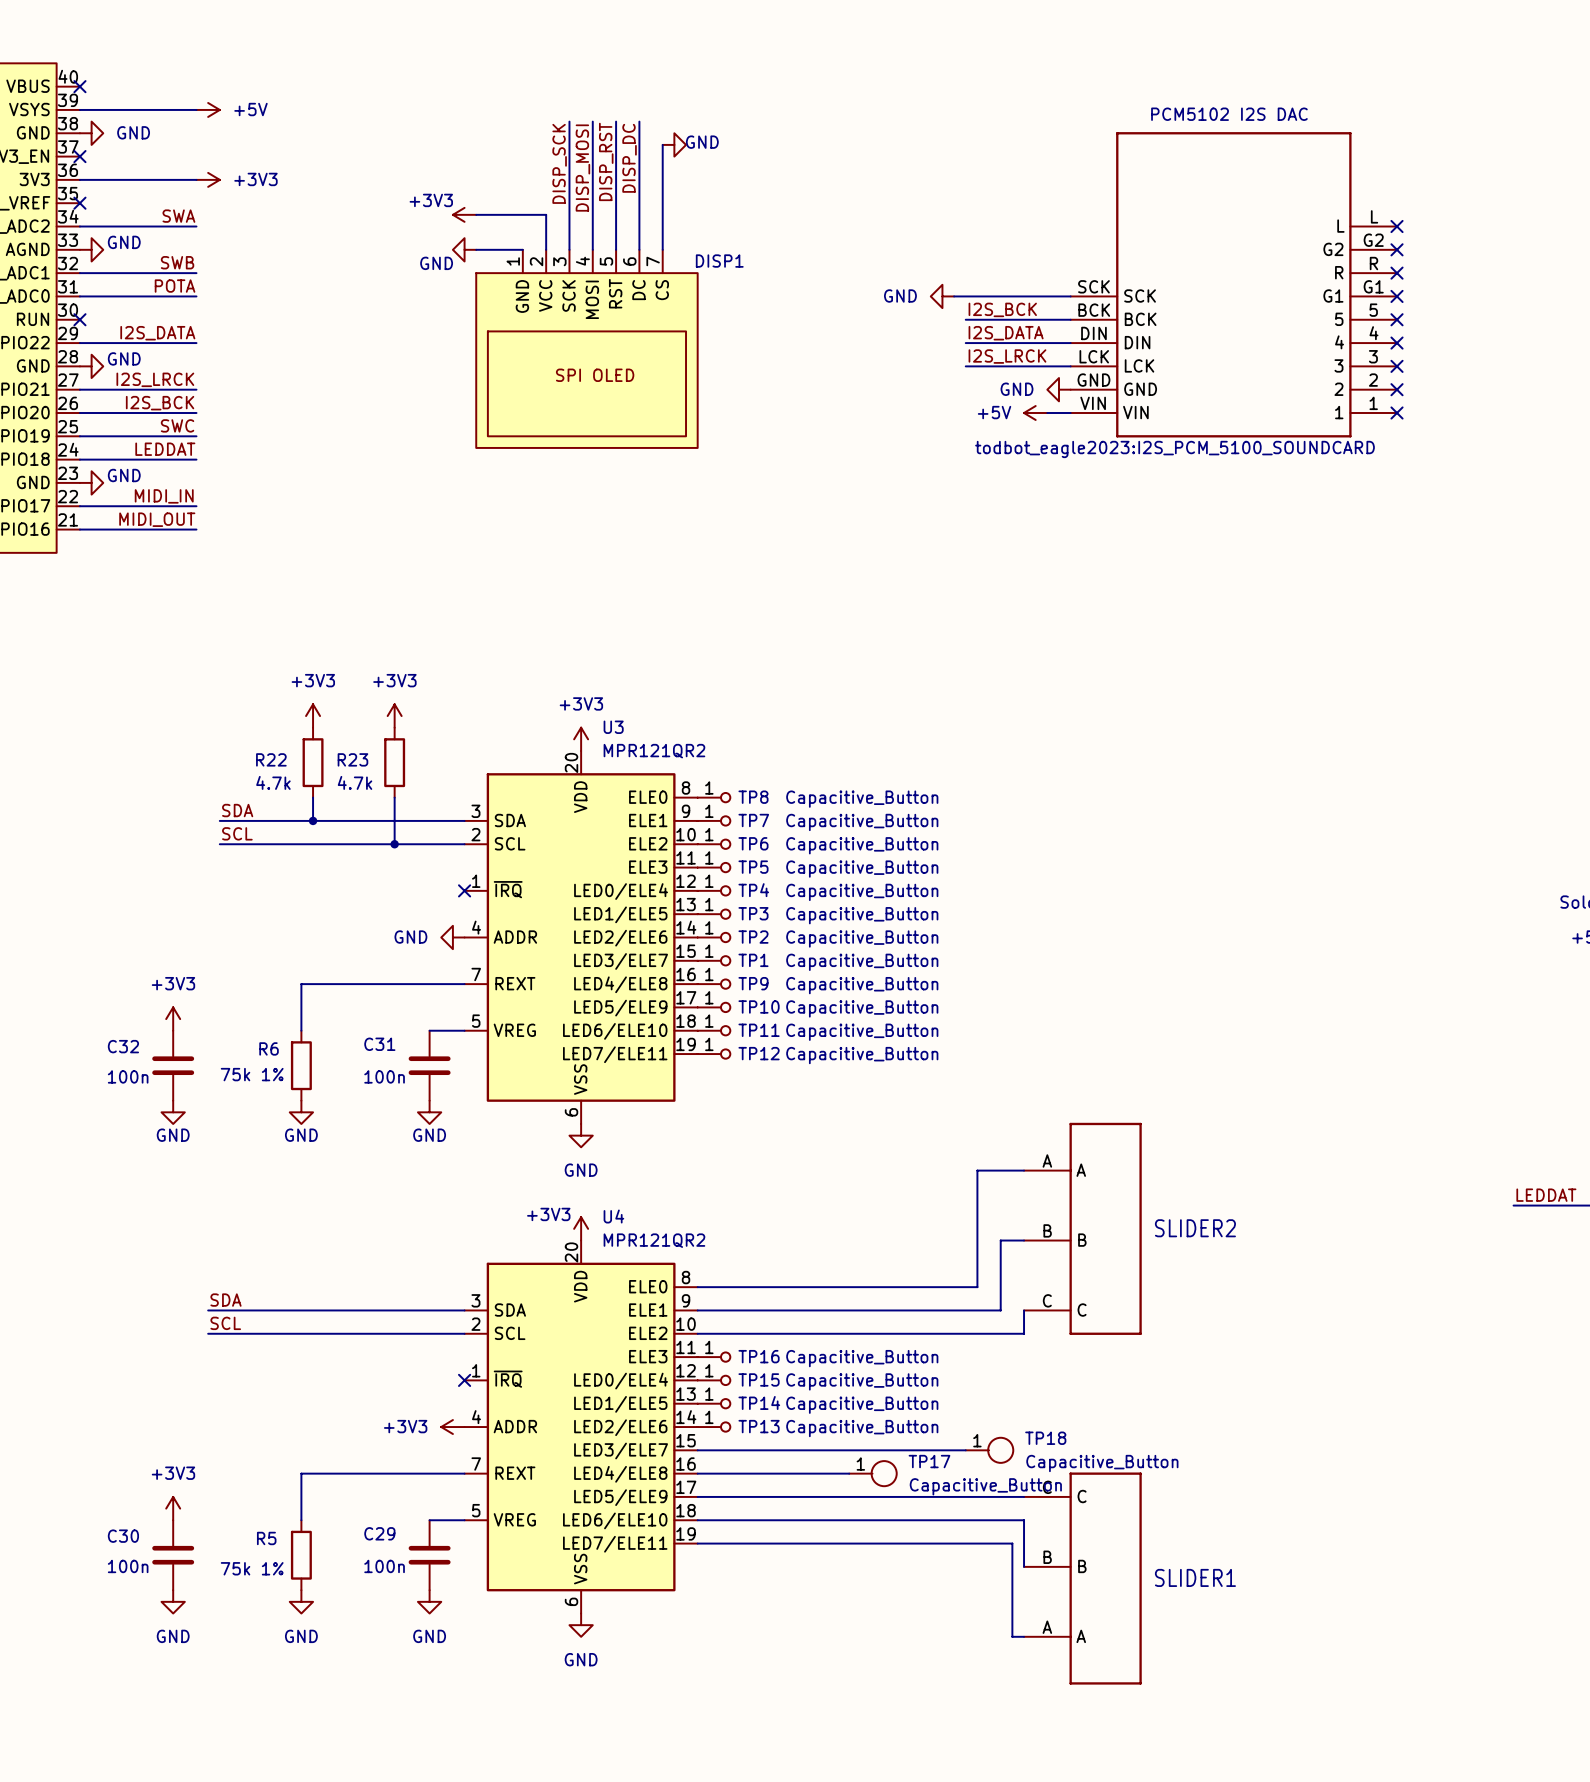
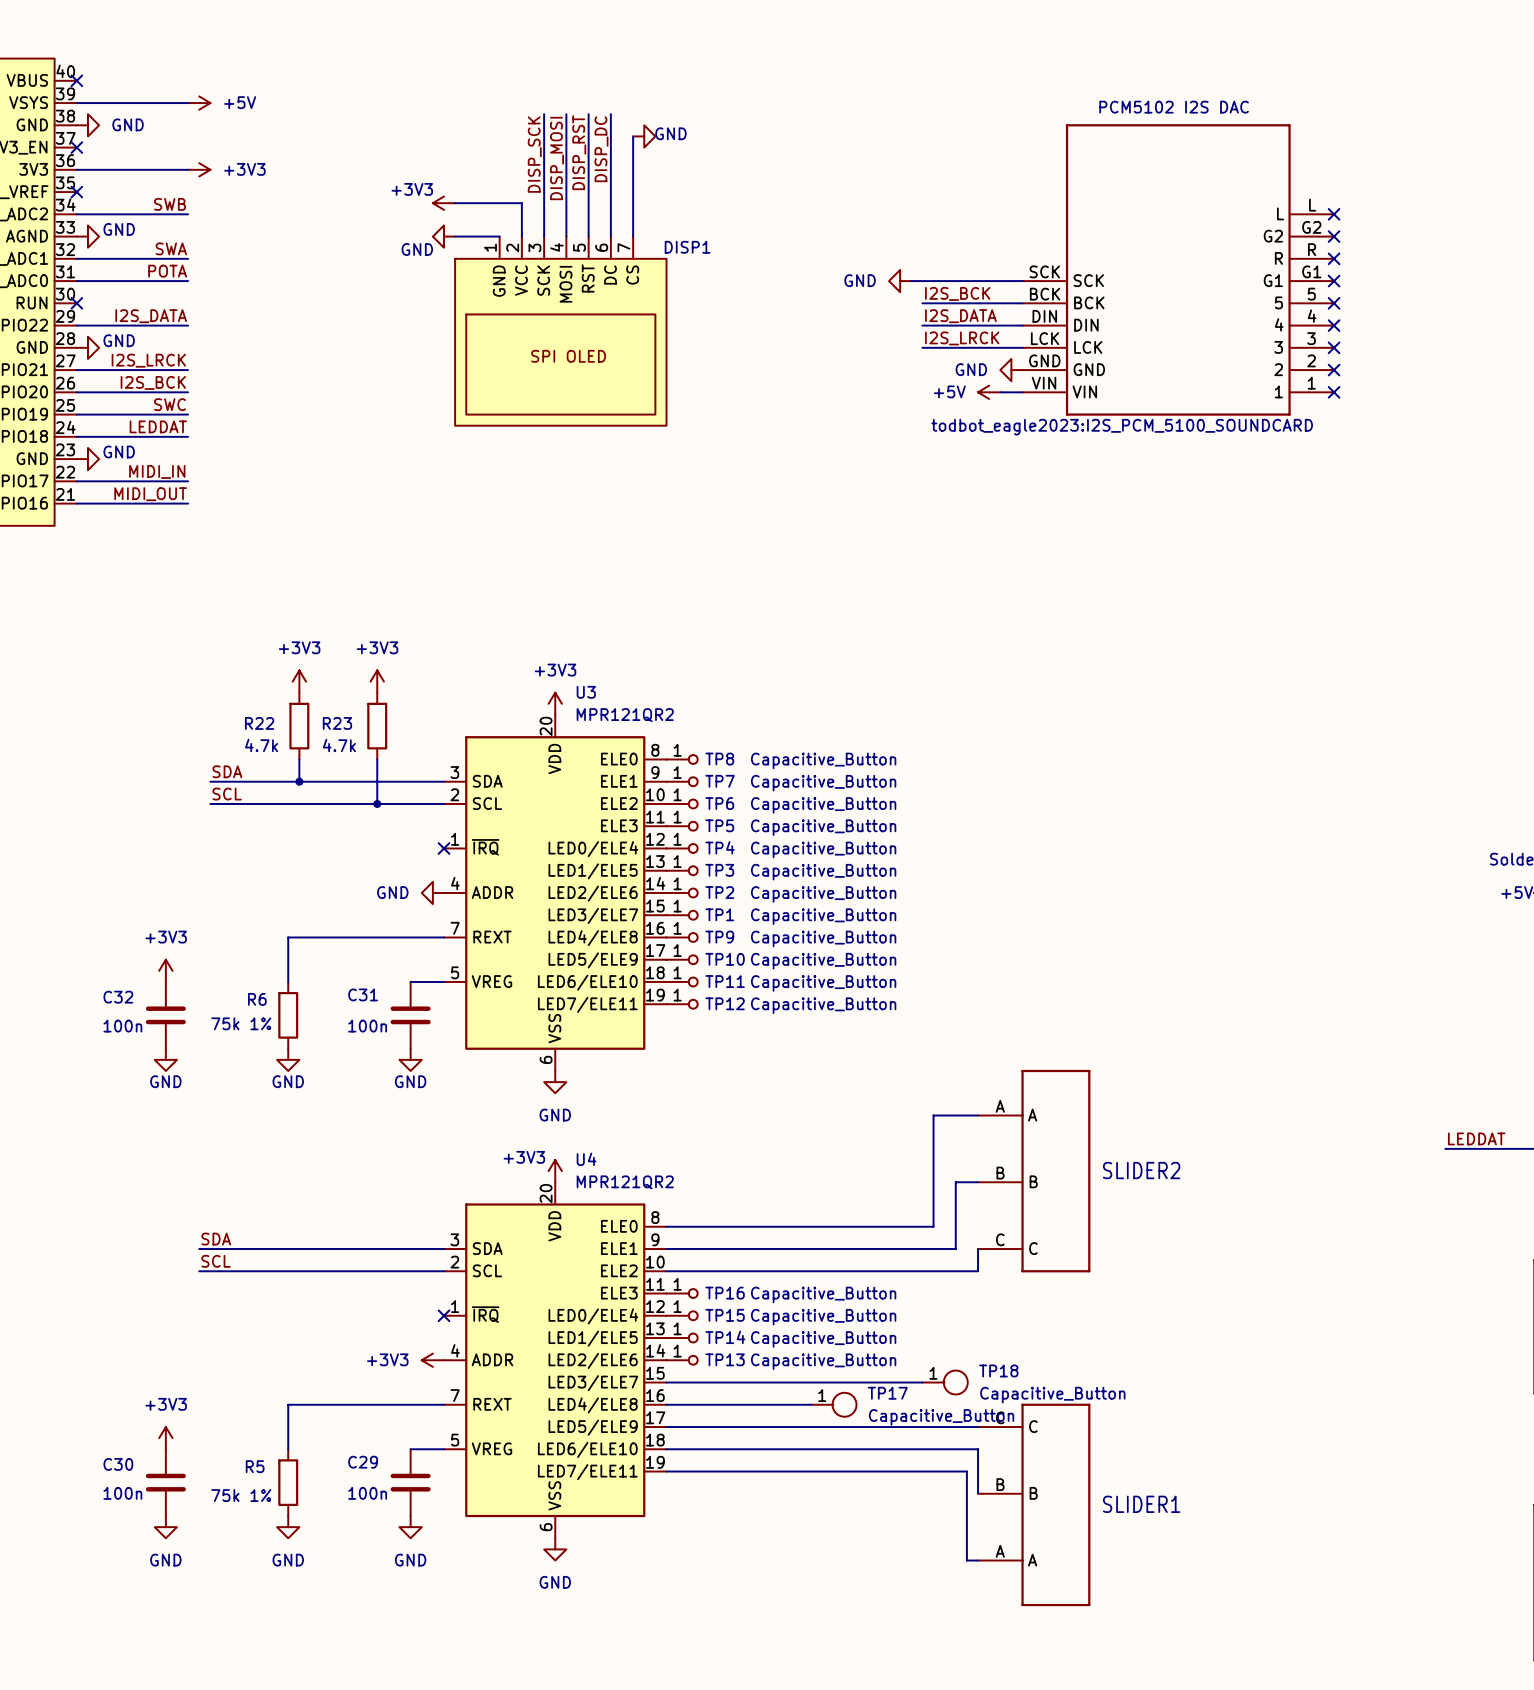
label: SWA (178, 216) -> SWB (170, 204)
label: SWB (177, 262) -> SWA (171, 248)

